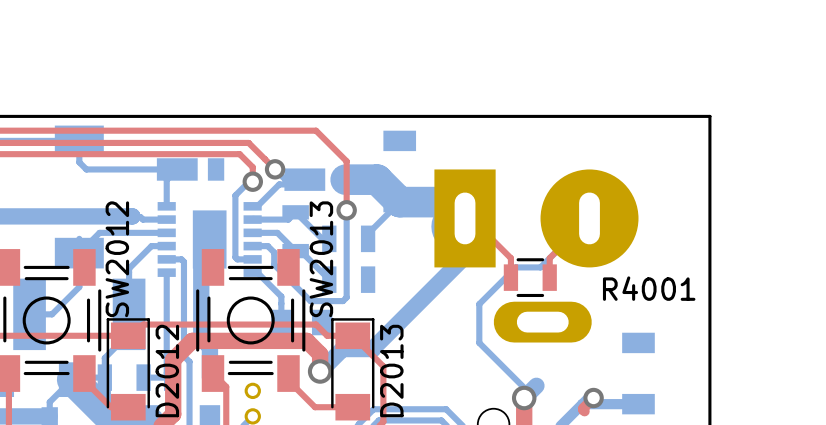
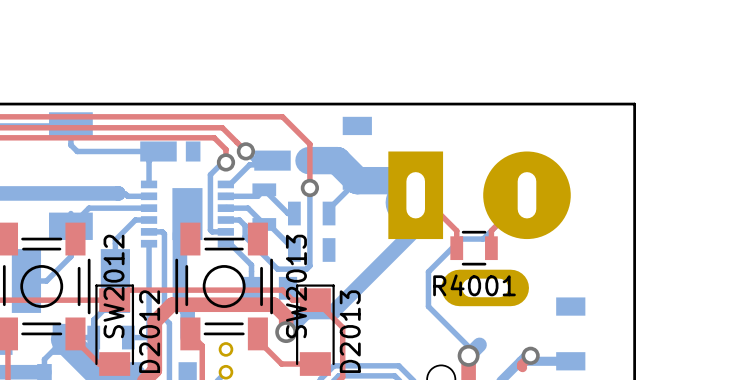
SW2012 name position: SW2012 (117, 259) -> SW2012 (114, 286)
SW2013 name position: SW2013 (321, 259) -> SW2013 (296, 286)
R4001 name position: R4001 (649, 288) -> R4001 (474, 285)

